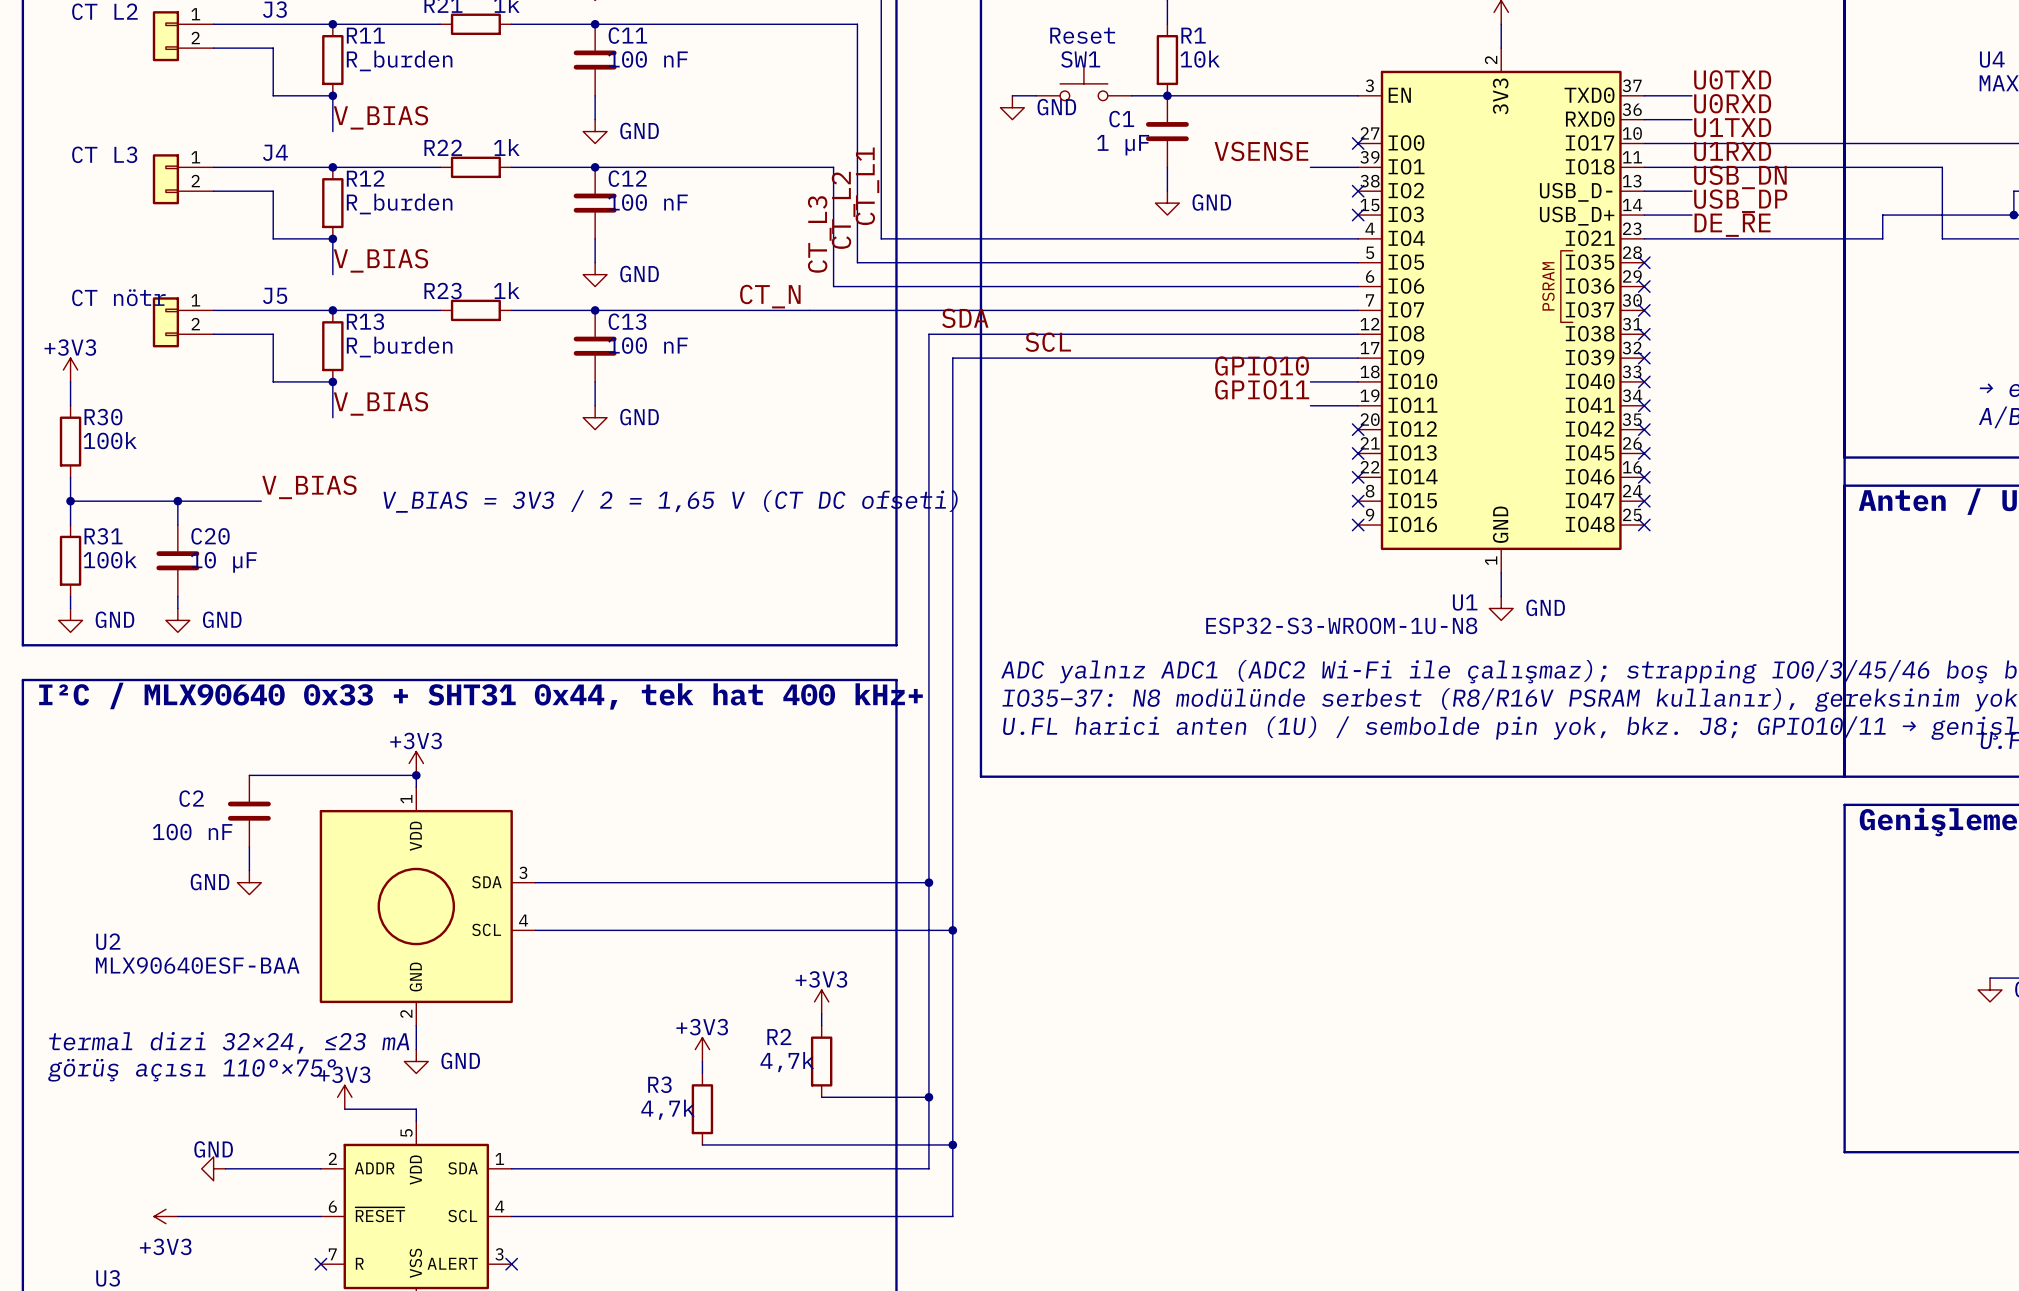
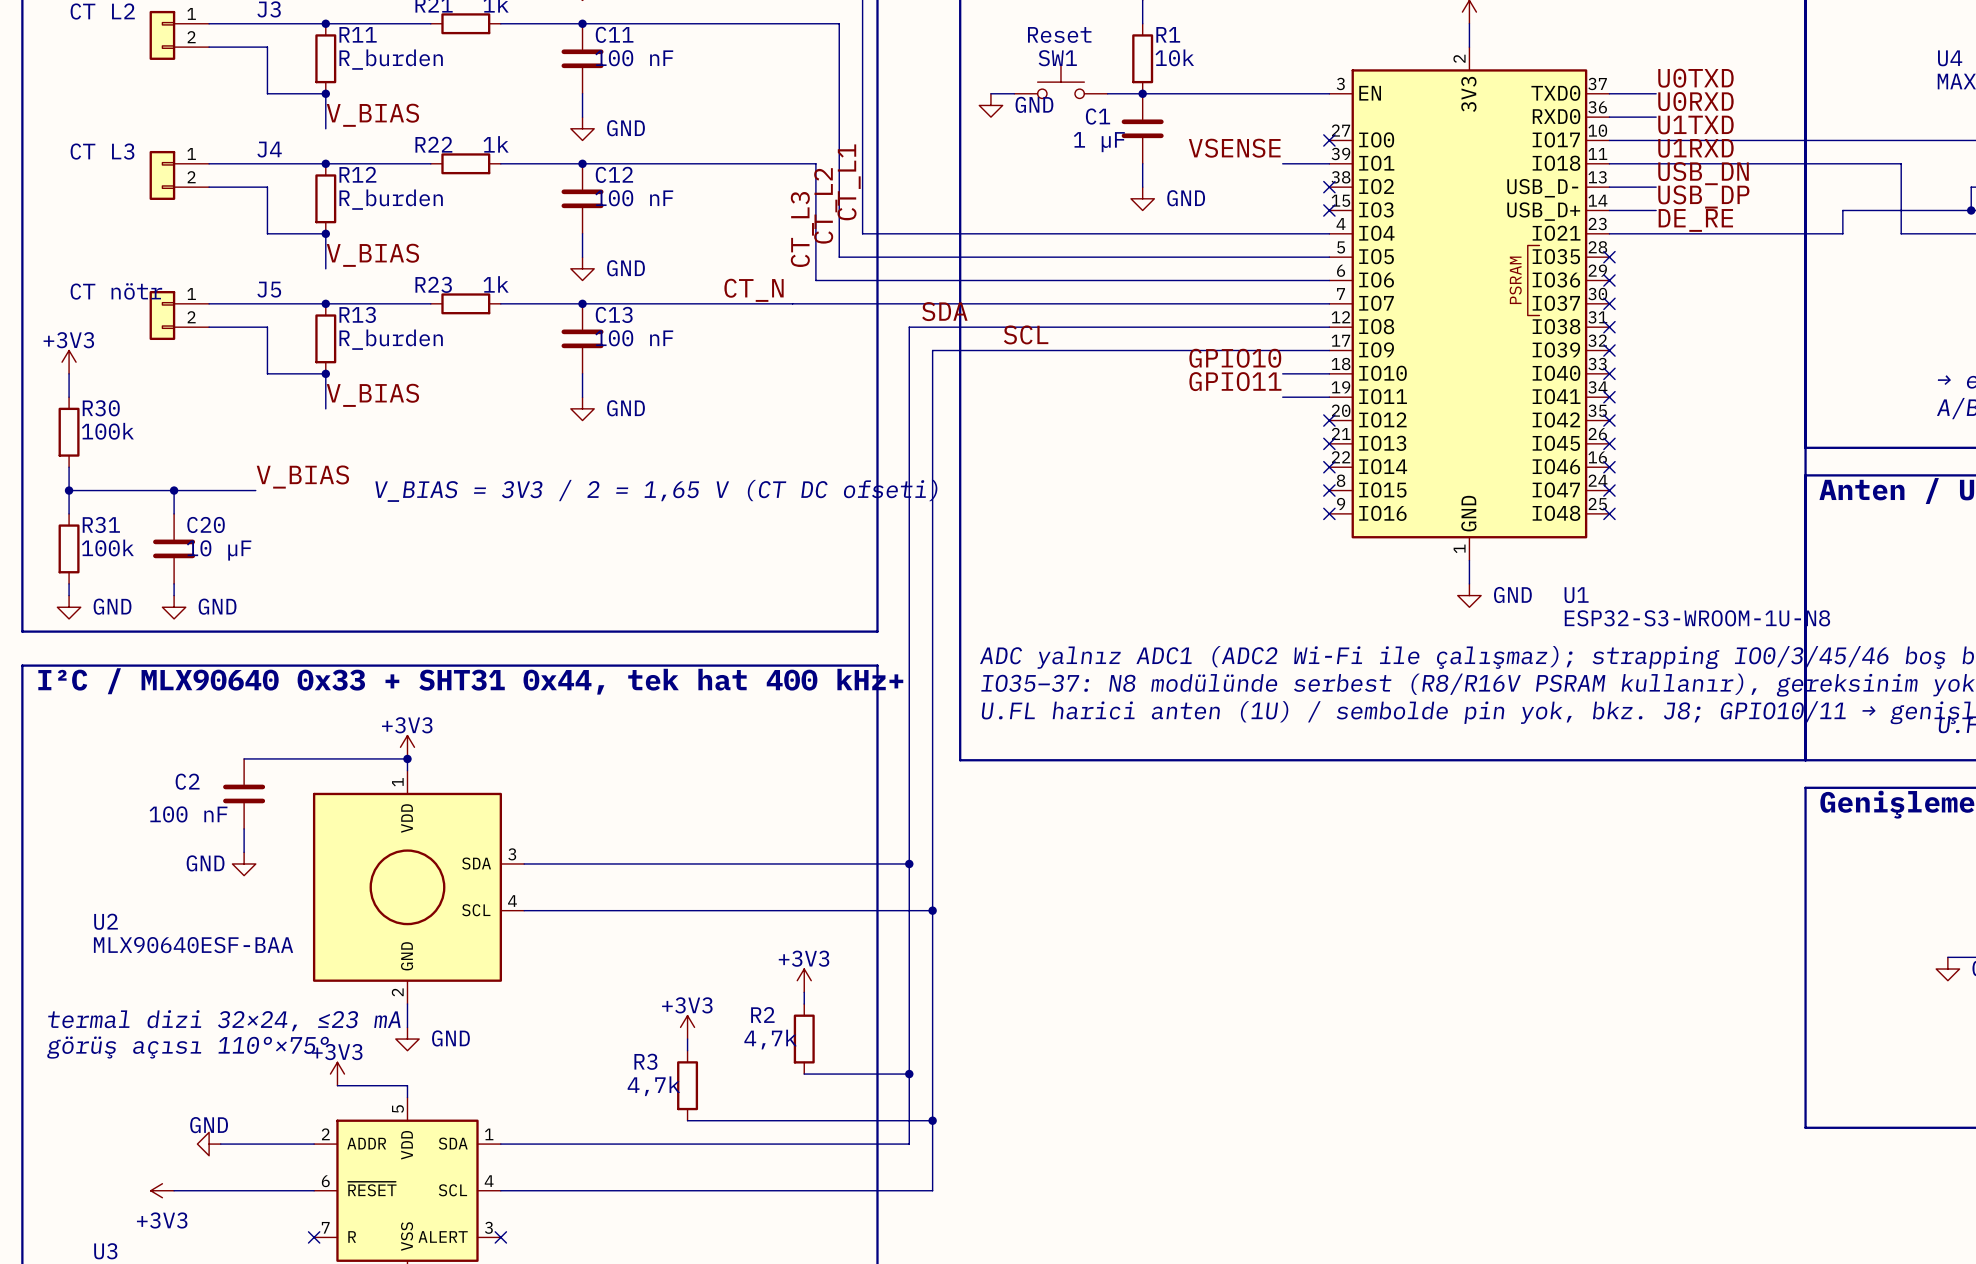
U1 name position: U1 (1465, 602) -> U1 (1576, 595)
U1 value position: ESP32-S3-WROOM-1U-N8 (1341, 625) -> ESP32-S3-WROOM-1U-N8 (1697, 618)

